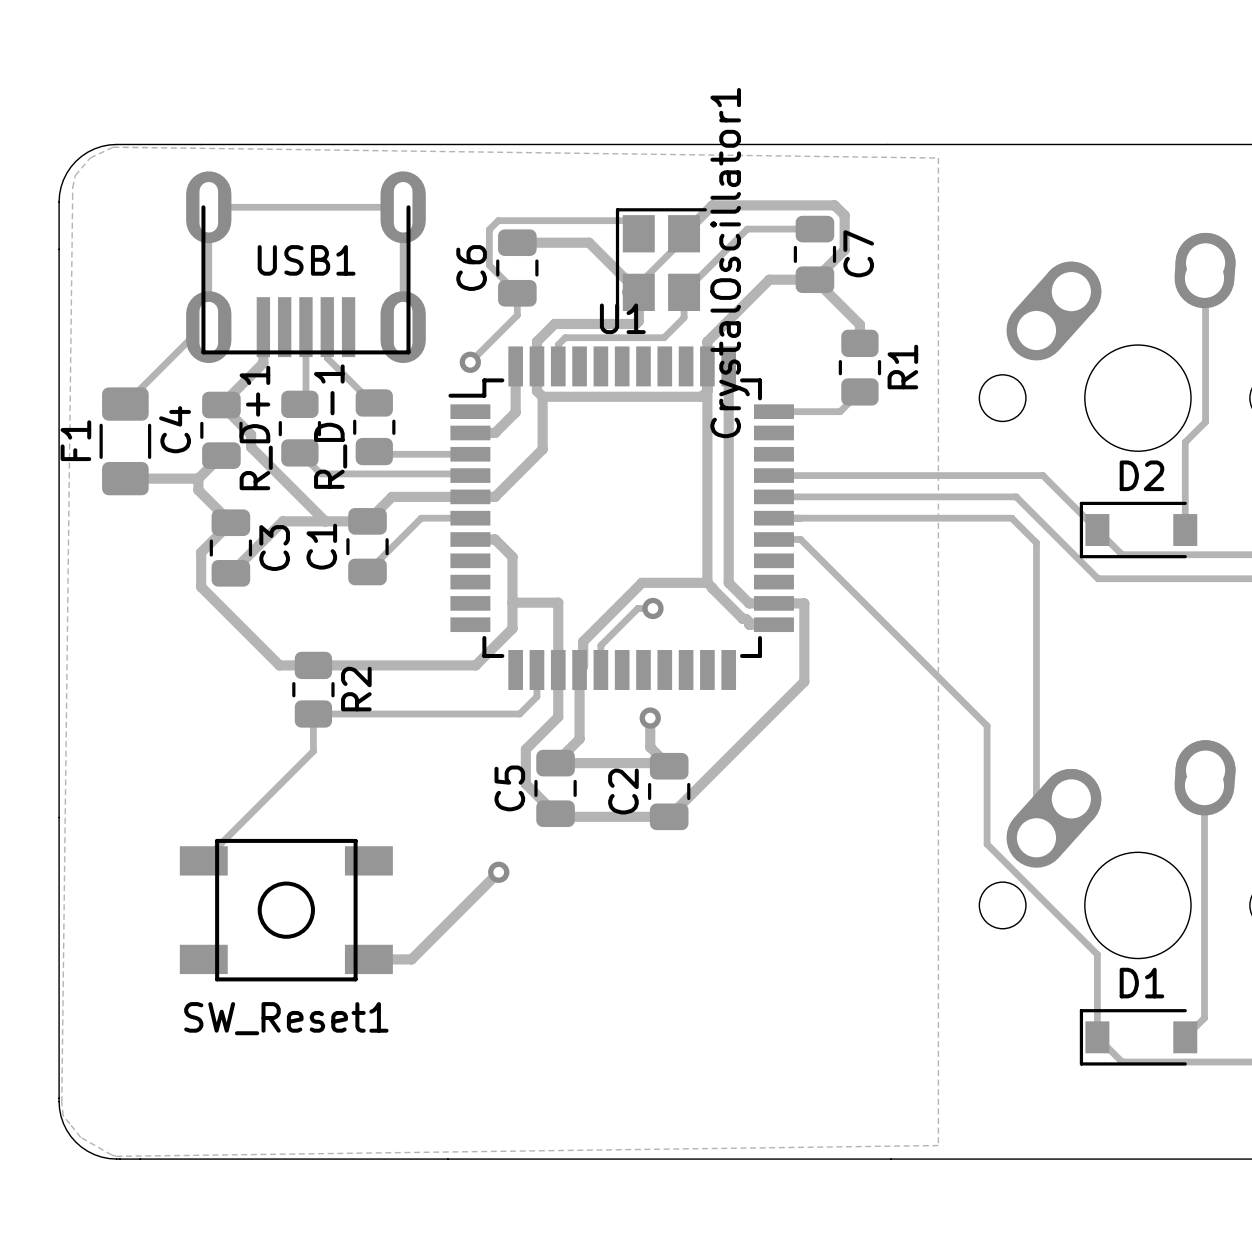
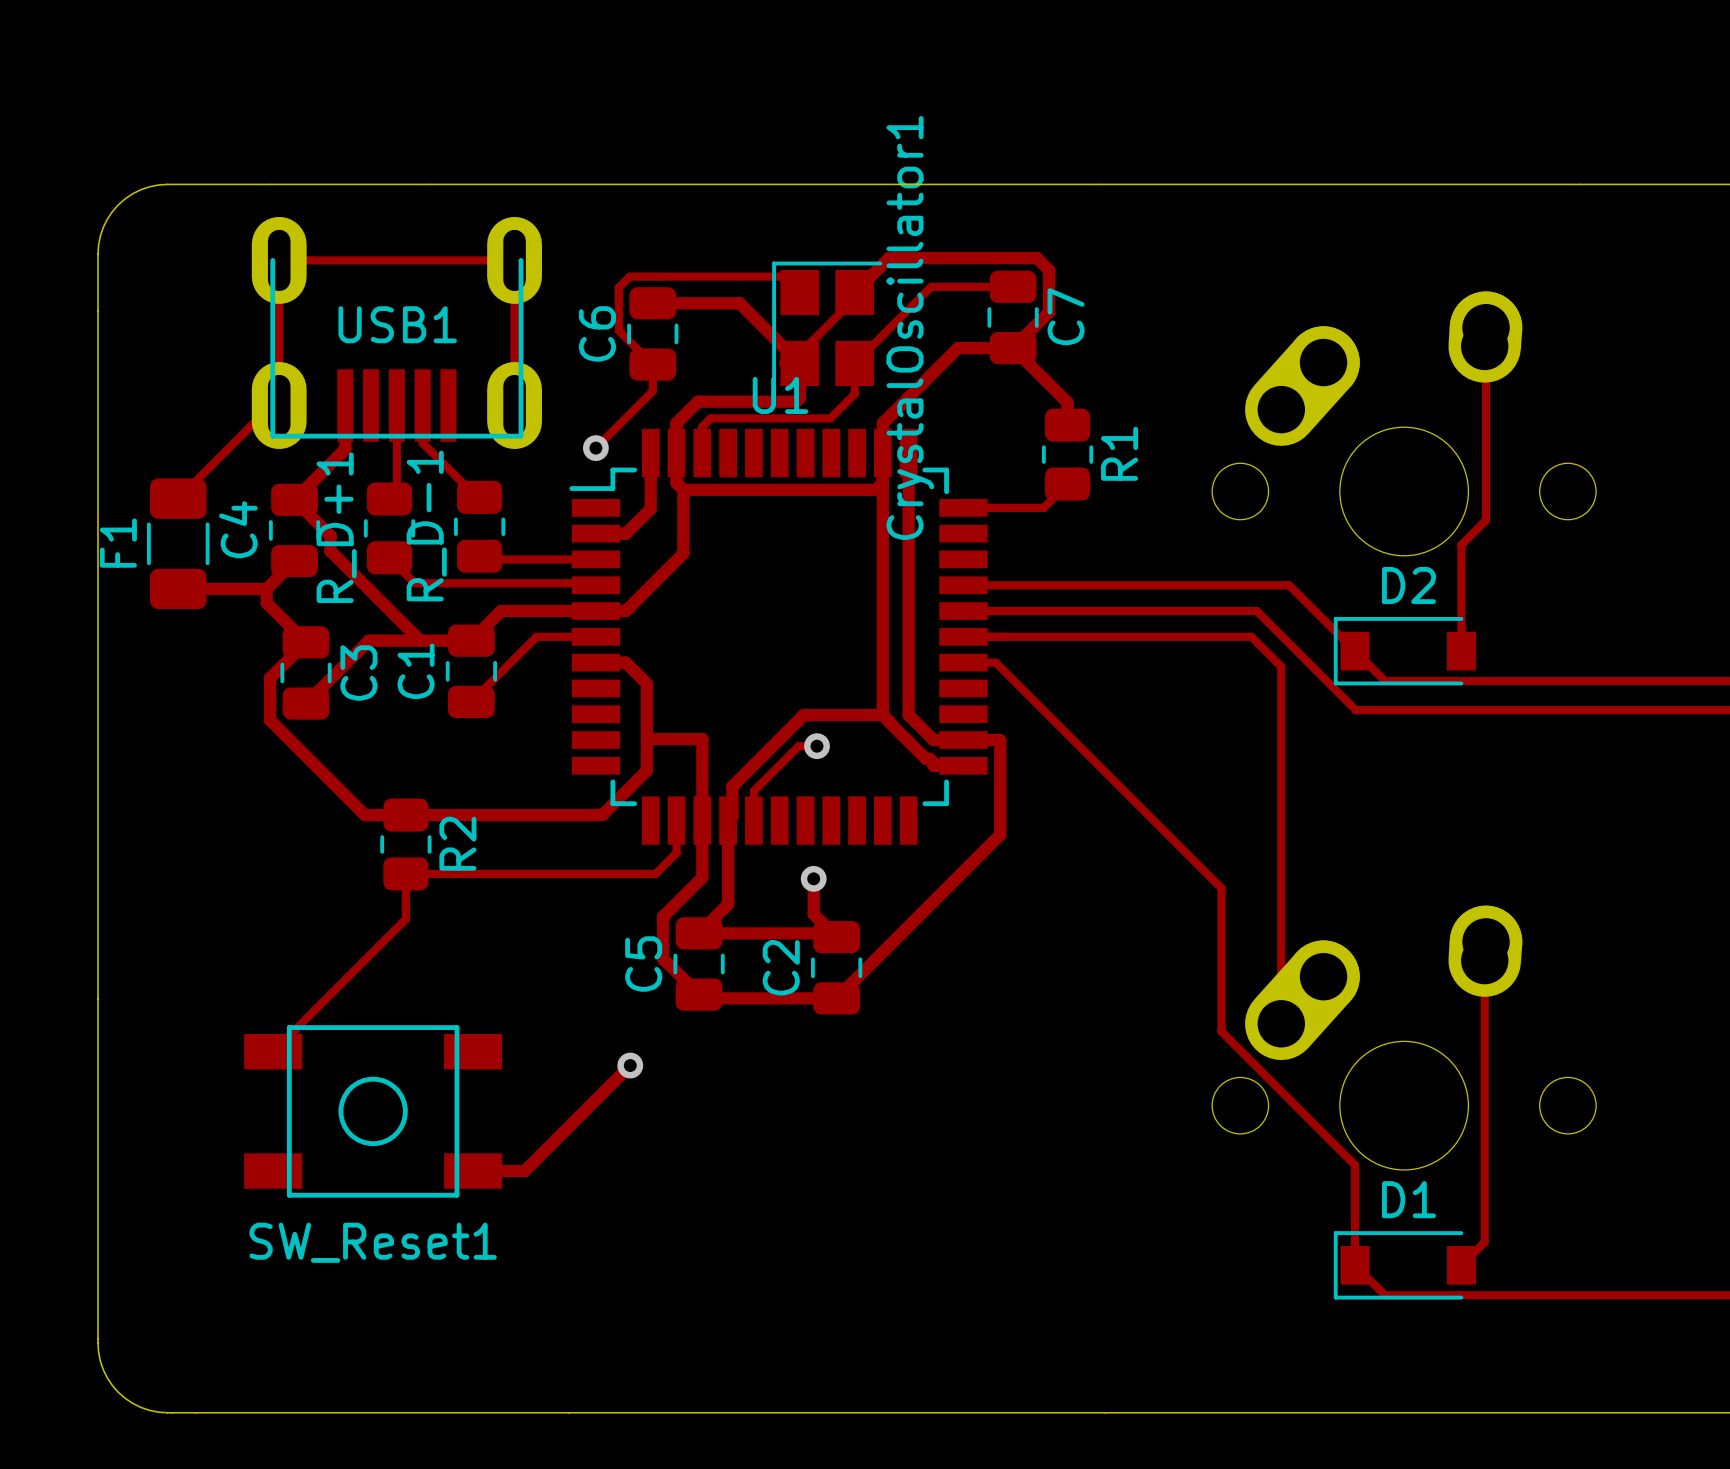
zone outline: (113, 147) (90, 158) (75, 175) (72, 187) (61, 1102) (63, 1115) (80, 1137) (115, 1156) (938, 1145) (938, 158) (113, 147) -> none

